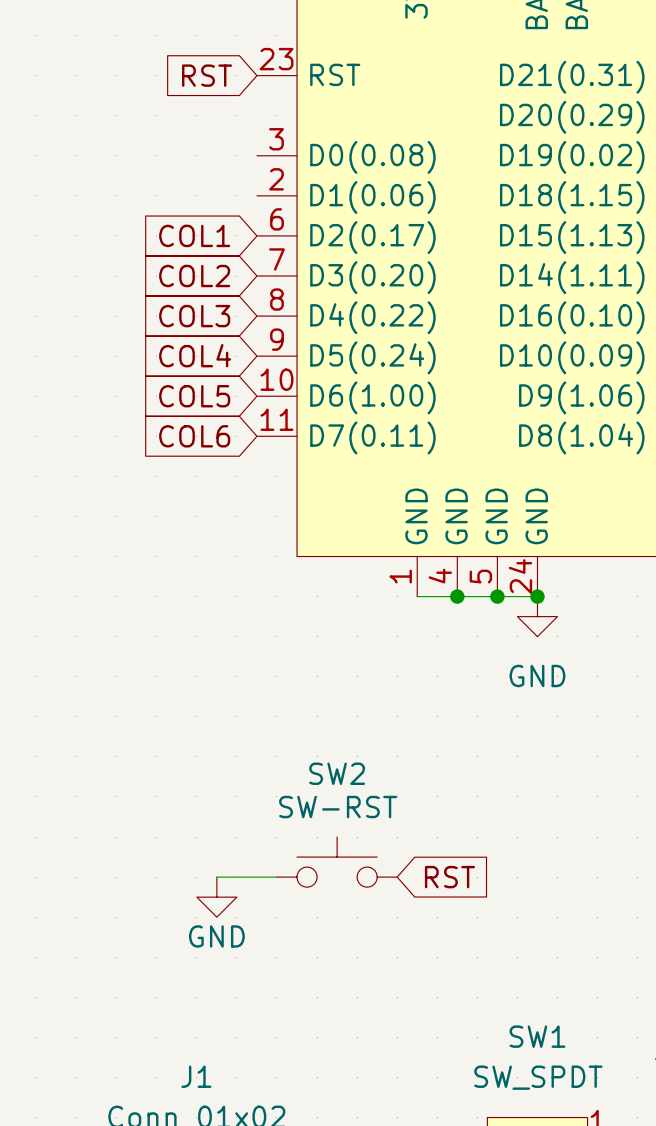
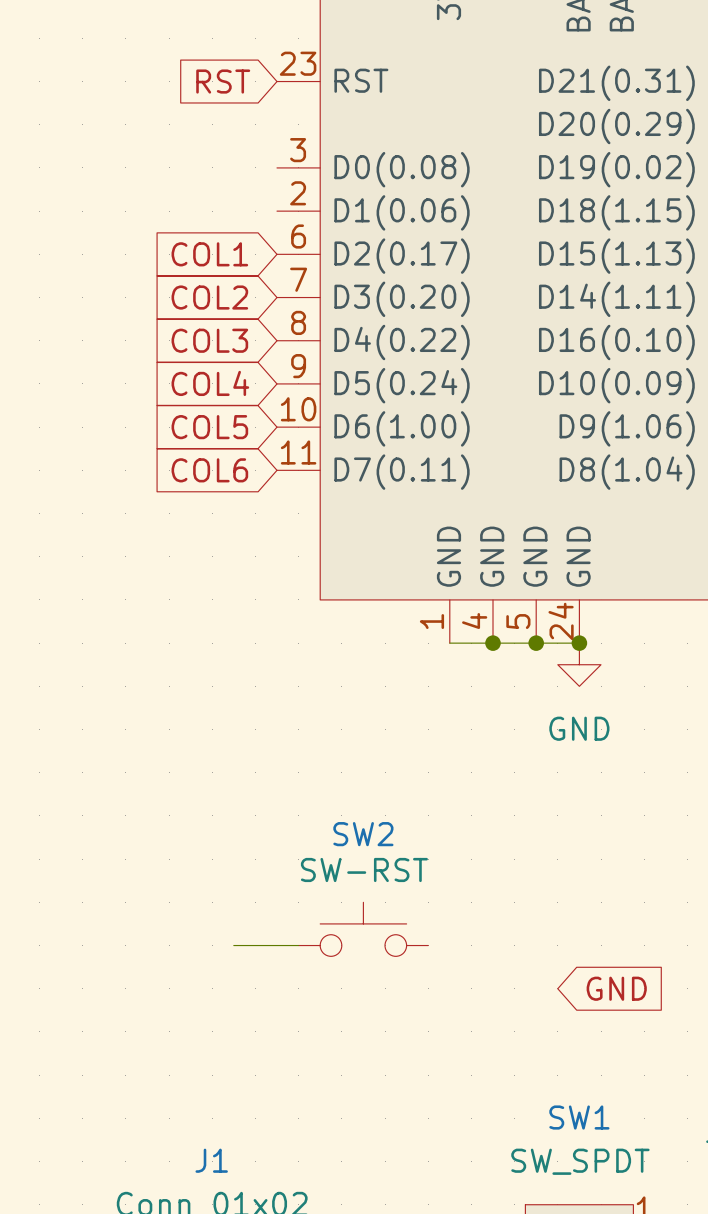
global label: RST (449, 877) -> none
power symbol: GND (216, 897) -> none
global label: none -> GND (616, 988)

